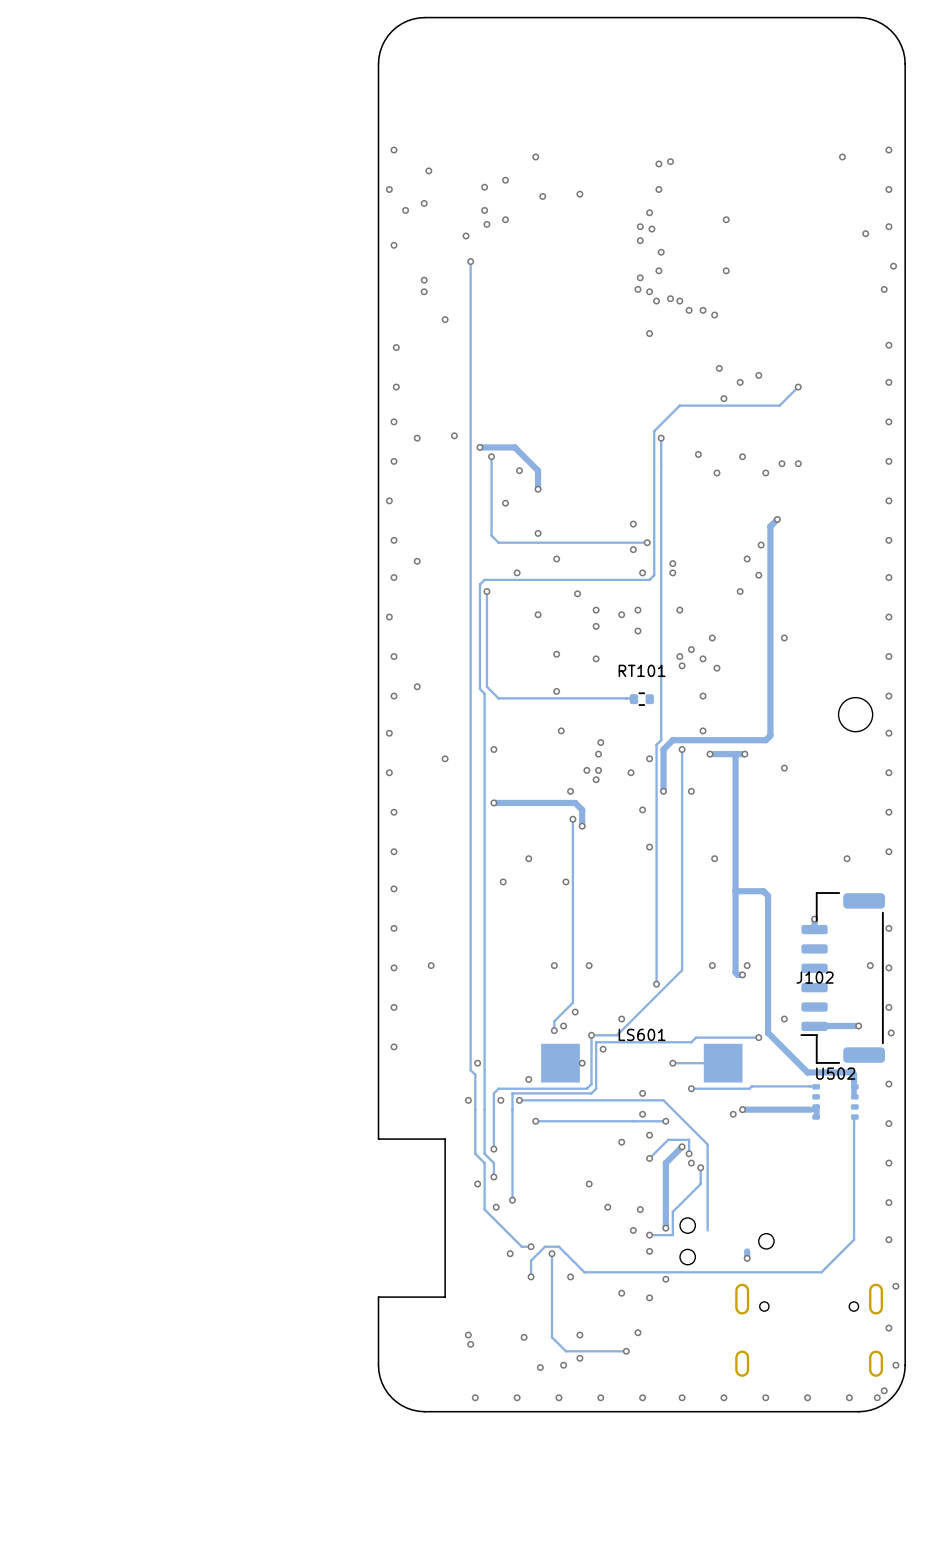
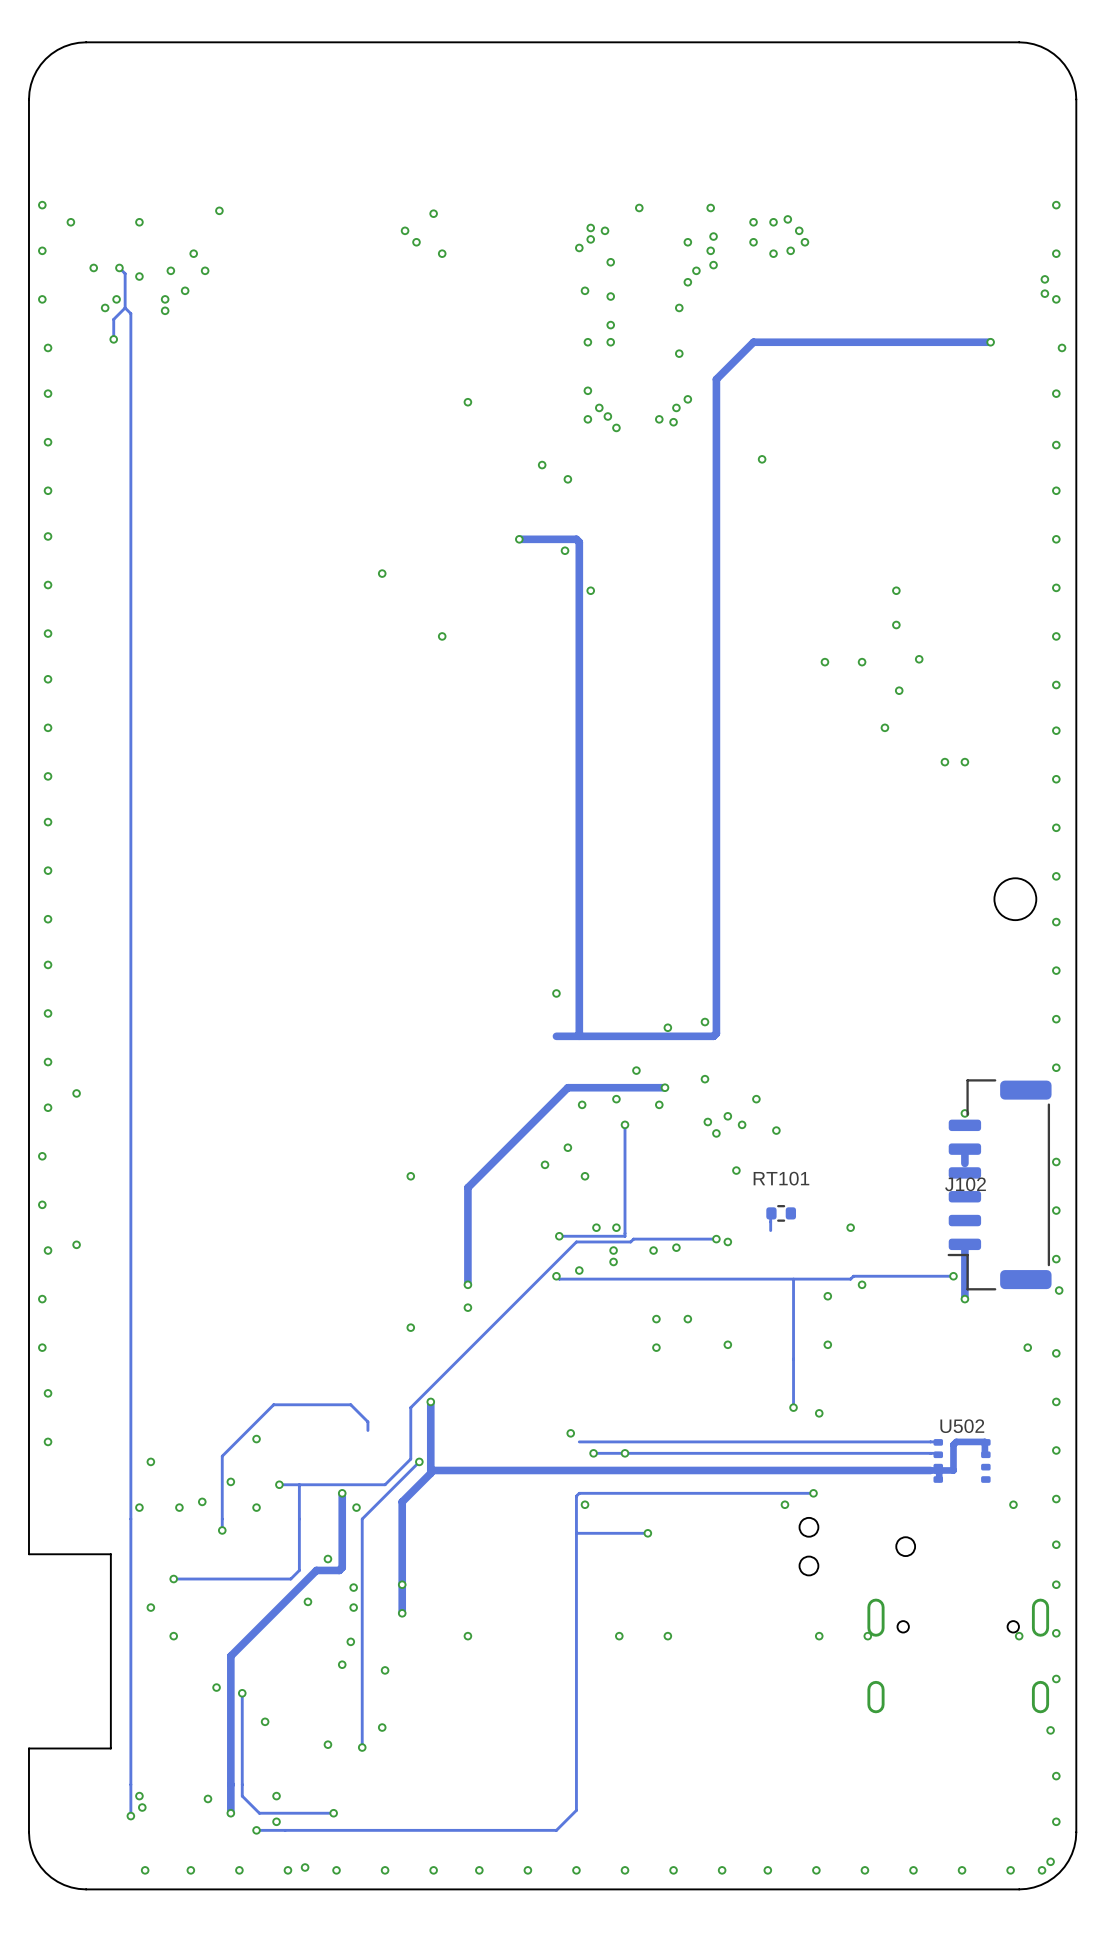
board edge: (424, 17) (407, 21) (392, 31) (382, 46) (378, 64) (378, 1139) (445, 1139) (445, 1297) (378, 1297) (378, 1365) (382, 1383) (392, 1398) (401, 1405) (412, 1410) (424, 1411) (858, 1411) (876, 1408) (891, 1398) (901, 1383) (905, 1365) -> (486, 42) (78, 42) (57, 49) (45, 59) (36, 70) (30, 84) (28, 99) (28, 1554) (110, 1554) (110, 1748) (28, 1748) (28, 1832) (33, 1854) (45, 1872) (57, 1881) (71, 1887) (86, 1889) (1026, 1888) (1041, 1885) (1059, 1872) (1068, 1860) (1074, 1847) (1076, 1832) (1076, 1698)
via: none -> (42, 205)
via position: (393, 150) -> (433, 213)
via: none -> (639, 207)
via: none -> (710, 207)
via: none -> (219, 210)
via: (535, 156) -> none
via: (842, 156) -> none
via: none -> (70, 222)
via: none -> (139, 222)
via: none -> (753, 222)
via: none -> (590, 227)
via: none -> (405, 230)
via: (428, 170) -> none
via: none -> (605, 230)
via: none -> (799, 230)
via: none -> (713, 236)
via: none -> (590, 239)
via: none -> (416, 242)
via: (505, 180) -> none
via: none -> (687, 242)
via: none -> (753, 242)
via: none -> (804, 242)
via: none -> (579, 247)
via: none -> (42, 250)
via: (484, 187) -> none
via: none -> (710, 250)
via: none -> (790, 250)
via: none -> (193, 253)
via: (579, 194) -> none
via: none -> (610, 262)
via: (542, 196) -> none
via: none -> (713, 265)
via: none -> (93, 267)
track: none -> (119, 267) (125, 273) (125, 307)
via: none -> (119, 267)
via: none -> (170, 270)
via: none -> (205, 270)
via: (424, 203) -> none
via: none -> (696, 270)
via: none -> (139, 276)
via: (405, 210) -> none
via: (484, 210) -> none
via: none -> (1044, 279)
via: none -> (687, 282)
via: (649, 212) -> none
via: none -> (185, 290)
via: (726, 219) -> none
via: none -> (1044, 293)
via: (486, 224) -> none
via: none -> (610, 296)
via: none -> (42, 299)
via: none -> (116, 299)
via: none -> (165, 299)
via: (640, 226) -> none
via: (651, 229) -> none
via: none -> (105, 307)
track: none -> (125, 307) (130, 313) (130, 1816)
track: none -> (125, 307) (113, 319) (113, 339)
via: none -> (679, 307)
via: (865, 233) -> none
via: none -> (165, 310)
via: (466, 235) -> none
via: (640, 240) -> none
via: (393, 245) -> none
via: none -> (610, 325)
via: (661, 252) -> none
via: none -> (113, 339)
track: (470, 261) (470, 1070) (475, 1074) (475, 1153) (484, 1163) (484, 1209) (521, 1246) (531, 1246) -> none
via: (470, 261) -> none
via: none -> (587, 342)
via: none -> (610, 342)
track: none -> (990, 342) (753, 342) (716, 379) (716, 1033) (713, 1036) (556, 1036)
via: none -> (990, 342)
via: none -> (48, 347)
via: none -> (679, 353)
via: (658, 270) -> none
via: (726, 270) -> none
via: (640, 277) -> none
via: (424, 280) -> none
via: (637, 289) -> none
via position: (884, 289) -> (1056, 393)
via: (424, 291) -> none
via: (649, 291) -> none
via: (670, 298) -> none
via: none -> (587, 390)
via: (656, 301) -> none
via: (679, 301) -> none
via: none -> (48, 393)
via: none -> (687, 399)
via: none -> (467, 402)
via: (689, 310) -> none
via: (703, 310) -> none
via: none -> (599, 407)
via: none -> (676, 407)
via: (714, 314) -> none
via: (445, 319) -> none
via: none -> (607, 416)
via: none -> (587, 419)
via: none -> (659, 419)
via: none -> (673, 422)
via: none -> (616, 427)
via position: (649, 333) -> (762, 459)
via: none -> (48, 442)
via: (396, 347) -> none
via: none -> (542, 465)
via: (719, 368) -> none
via: none -> (567, 479)
via: (758, 375) -> none
via: none -> (48, 490)
via: (740, 382) -> none
via: (396, 387) -> none
track: (798, 387) (779, 405) (679, 405) (654, 431) (654, 575) (649, 579) (484, 579) (479, 584) (479, 689) (484, 693) (484, 1153) (493, 1163) (493, 1177) -> none
via: (798, 387) -> none
via: (723, 398) -> none
via: none -> (48, 536)
via: (393, 421) -> none
track: none -> (519, 539) (576, 539) (579, 542) (579, 1036)
via: none -> (565, 550)
via position: (454, 435) -> (519, 539)
via: (417, 438) -> none
track: (661, 438) (661, 740) (656, 744) (656, 970) -> none
via: (661, 438) -> none
track: (479, 447) (514, 447) (538, 470) (538, 489) -> none
via: (479, 447) -> none
via: none -> (382, 573)
via: (698, 454) -> none
track: (491, 456) (491, 535) (498, 542) (647, 542) -> none
via: (491, 456) -> none
via: (742, 456) -> none
via: none -> (48, 585)
via: (393, 461) -> none
via: none -> (590, 590)
via: none -> (896, 590)
via: (782, 463) -> none
via: (798, 463) -> none
via: (519, 470) -> none
via: (716, 473) -> none
via: (765, 473) -> none
via: (538, 489) -> none
via: none -> (896, 625)
via: none -> (48, 633)
via: (505, 503) -> none
track: (777, 519) (770, 526) (770, 735) (765, 740) (672, 740) (663, 749) (663, 791) -> none
via: none -> (824, 662)
via: none -> (862, 662)
via: (633, 524) -> none
via: (538, 533) -> none
via: none -> (48, 679)
via: (393, 540) -> none
via: (647, 542) -> none
via: (633, 549) -> none
via: (556, 558) -> none
via: (747, 558) -> none
via: (417, 561) -> none
via: (672, 563) -> none
via: (517, 572) -> none
via: (642, 572) -> none
via: (672, 572) -> none
via: none -> (48, 727)
via: none -> (884, 727)
via: (758, 575) -> none
via: (393, 577) -> none
track: (486, 591) (486, 686) (498, 698) (633, 698) -> none
via: (486, 591) -> none
via: (740, 591) -> none
via: (577, 593) -> none
via: none -> (944, 762)
via: none -> (964, 762)
via: (596, 610) -> none
via: (637, 610) -> none
via: (679, 610) -> none
via: none -> (48, 776)
via: (538, 614) -> none
via: (621, 614) -> none
via: (389, 617) -> none
via: (596, 626) -> none
via: (637, 631) -> none
via: (712, 637) -> none
via: (784, 637) -> none
via: (691, 649) -> none
via: none -> (48, 822)
via: (556, 654) -> none
via: (393, 656) -> none
via: (679, 656) -> none
via: (596, 658) -> none
via: (703, 658) -> none
via: (682, 665) -> none
via: (716, 668) -> none
via: (417, 686) -> none
via: none -> (48, 870)
via: (556, 691) -> none
via: (393, 696) -> none
via: (703, 696) -> none
RT101 position: (641, 699) -> (781, 1213)
via: none -> (48, 919)
via: (561, 730) -> none
via: (703, 730) -> none
via: (389, 733) -> none
via: (600, 742) -> none
via: (493, 749) -> none
track: (682, 749) (682, 970) (617, 1035) (591, 1035) (591, 1084) (586, 1088) (498, 1088) (493, 1093) (493, 1149) -> none
via: (682, 749) -> none
via: (598, 754) -> none
via: (709, 754) -> none
track: (735, 754) (735, 972) (742, 974) -> none
track: (744, 754) (709, 754) -> none
via: (744, 754) -> none
via: (445, 758) -> none
via: (649, 758) -> none
via: none -> (48, 964)
via: (784, 768) -> none
via: (586, 770) -> none
via: (598, 770) -> none
via: (389, 772) -> none
via: (630, 772) -> none
via: (596, 779) -> none
via: (570, 791) -> none
via: (663, 791) -> none
via: (691, 791) -> none
track: (493, 802) (575, 802) (582, 809) (582, 826) -> none
via position: (493, 802) -> (556, 993)
via: none -> (48, 1013)
via: (642, 809) -> none
via: (393, 812) -> none
via: none -> (704, 1022)
track: (572, 819) (572, 1002) (554, 1021) (554, 1030) -> none
via: (582, 826) -> none
via: none -> (48, 1062)
via: (649, 847) -> none
via: (393, 851) -> none
via: none -> (636, 1070)
via: (528, 858) -> none
via: (714, 858) -> none
via: (847, 858) -> none
via: none -> (704, 1079)
track: none -> (664, 1087) (567, 1087) (467, 1187) (467, 1284)
via: none -> (664, 1087)
via: none -> (76, 1093)
via: none -> (616, 1099)
via: none -> (756, 1099)
via: none -> (48, 1107)
via: (393, 888) -> none
via: none -> (964, 1113)
via: none -> (727, 1116)
track: (735, 891) (763, 891) (768, 895) (768, 1032) (807, 1072) (851, 1072) (854, 1074) (854, 1095) -> none
via: none -> (707, 1122)
track: none -> (625, 1124) (625, 1236) (559, 1236)
via: none -> (625, 1124)
via: none -> (742, 1124)
via: none -> (776, 1130)
via: none -> (716, 1133)
via: none -> (567, 1147)
via: (814, 919) -> none
via: none -> (42, 1156)
via: (393, 928) -> none
via: none -> (545, 1164)
via: none -> (736, 1170)
via: none -> (410, 1176)
via: none -> (585, 1176)
via: none -> (42, 1204)
via: (431, 965) -> none
via: (554, 965) -> none
via: (589, 965) -> none
via: (712, 965) -> none
via: (747, 965) -> none
via: (870, 965) -> none
via: (393, 967) -> none
via: (742, 974) -> none
J102 position: (842, 977) -> (999, 1184)
via: none -> (596, 1227)
via: none -> (616, 1227)
via: none -> (850, 1227)
via: (656, 984) -> none
via: none -> (559, 1236)
track: none -> (716, 1239) (633, 1239) (630, 1241) (576, 1241) (410, 1407) (410, 1459) (385, 1484) (279, 1484)
via: none -> (716, 1239)
via: none -> (727, 1241)
via: none -> (76, 1244)
track: none -> (964, 1244) (964, 1299)
via: none -> (676, 1247)
via: none -> (48, 1250)
via: none -> (613, 1250)
via: none -> (653, 1250)
via: (393, 1007) -> none
via: none -> (613, 1261)
via: (575, 1012) -> none
via: none -> (579, 1270)
via: (621, 1019) -> none
via: (784, 1019) -> none
via: none -> (556, 1276)
track: none -> (953, 1276) (853, 1276) (850, 1279) (559, 1279) (556, 1276)
via: none -> (953, 1276)
track: none -> (793, 1279) (793, 1407)
via: (563, 1026) -> none
track: (858, 1026) (814, 1026) -> none
via: (858, 1026) -> none
via: none -> (467, 1284)
via: none -> (862, 1284)
via: (554, 1030) -> none
via: (591, 1035) -> none
via: none -> (827, 1296)
track: (758, 1037) (696, 1037) (691, 1042) (596, 1042) (596, 1088) (591, 1093) (512, 1093) (512, 1200) -> none
via: (758, 1037) -> none
via: none -> (42, 1299)
via: none -> (964, 1299)
via: (393, 1046) -> none
via: none -> (467, 1307)
via: (603, 1049) -> none
via: none -> (656, 1319)
via: none -> (687, 1319)
via: none -> (410, 1327)
via: (477, 1063) -> none
via: (582, 1063) -> none
LS601: (641, 1063) -> none
via: (672, 1063) -> none
track: (723, 1063) (672, 1063) -> none
via: none -> (727, 1344)
via: none -> (42, 1347)
via: (528, 1079) -> none
via: none -> (656, 1347)
via: none -> (1027, 1347)
track: (816, 1086) (691, 1088) -> none
via position: (691, 1088) -> (827, 1344)
via: (642, 1093) -> none
via: (468, 1100) -> none
via: (500, 1100) -> none
track: (519, 1100) (663, 1100) (707, 1144) (707, 1230) -> none
via: (519, 1100) -> none
U502 position: (835, 1101) -> (962, 1460)
track: (742, 1109) (814, 1109) (816, 1107) (816, 1116) -> none
via: (742, 1109) -> none
via: (642, 1114) -> none
via: (733, 1114) -> none
via: none -> (48, 1393)
track: (854, 1116) (854, 1239) (821, 1272) (584, 1272) (558, 1246) (545, 1246) (531, 1260) (531, 1276) -> none
via: (535, 1121) -> none
track: (665, 1121) (535, 1121) -> none
via: (665, 1121) -> none
track: none -> (430, 1401) (430, 1473) (402, 1501) (402, 1613)
via: none -> (430, 1401)
via: none -> (793, 1407)
via: none -> (819, 1413)
via: (649, 1135) -> none
via: (621, 1142) -> none
track: none -> (367, 1430) (367, 1421) (350, 1404) (273, 1404) (222, 1456) (222, 1530)
track: (682, 1146) (665, 1163) (665, 1228) -> none
via: (682, 1146) -> none
via: none -> (256, 1439)
track: (689, 1153) (689, 1139) (668, 1139) (649, 1158) -> none
via: (689, 1153) -> none
via: none -> (48, 1441)
track: none -> (939, 1441) (579, 1441)
via: (649, 1158) -> none
via: (691, 1163) -> none
via: none -> (593, 1453)
via: none -> (625, 1453)
track: none -> (939, 1453) (593, 1453)
track: none -> (984, 1453) (984, 1441) (956, 1441) (953, 1444) (953, 1470) (939, 1470)
track: (700, 1167) (700, 1184) (672, 1211) (672, 1235) (649, 1235) -> none
via: (700, 1167) -> none
via: none -> (150, 1461)
track: none -> (419, 1461) (362, 1519) (362, 1747)
via: none -> (419, 1461)
via: (493, 1177) -> none
track: none -> (430, 1470) (936, 1470) (939, 1467) (939, 1479)
via: (477, 1184) -> none
via: (589, 1184) -> none
via: none -> (230, 1481)
via: none -> (279, 1484)
track: none -> (299, 1484) (299, 1570) (290, 1579) (173, 1579)
track: none -> (342, 1493) (342, 1567) (339, 1570) (316, 1570) (230, 1656) (230, 1813)
via: none -> (342, 1493)
track: none -> (813, 1493) (579, 1493) (576, 1496) (576, 1810) (556, 1830) (256, 1830)
via: none -> (813, 1493)
via: (512, 1200) -> none
via: none -> (202, 1501)
via: (496, 1207) -> none
via: none -> (585, 1504)
via: (607, 1207) -> none
via: none -> (784, 1504)
via: none -> (1013, 1504)
via: none -> (139, 1507)
via: none -> (179, 1507)
via: none -> (256, 1507)
via: none -> (356, 1507)
via: (640, 1209) -> none
via: none -> (222, 1530)
via: (665, 1228) -> none
track: none -> (647, 1533) (576, 1533)
via: none -> (647, 1533)
via: (633, 1230) -> none
via: (649, 1235) -> none
via: (531, 1246) -> none
via: none -> (327, 1559)
via: (649, 1251) -> none
track: (747, 1251) (747, 1258) -> none
via: (510, 1253) -> none
track: (551, 1253) (551, 1337) (565, 1351) (626, 1351) -> (242, 1693) (242, 1796) (259, 1813) (333, 1813)
via: (551, 1253) -> none
via: (747, 1258) -> none
via: none -> (173, 1579)
via: none -> (402, 1584)
via: none -> (1056, 1584)
via: none -> (353, 1587)
via: (531, 1276) -> none
via: (570, 1276) -> none
via: (665, 1279) -> none
via: none -> (307, 1601)
via: (895, 1286) -> none
via: none -> (150, 1607)
via: none -> (353, 1607)
via: (621, 1293) -> none
via: none -> (402, 1613)
via: (649, 1297) -> none
via: none -> (1056, 1633)
via: none -> (173, 1636)
via: none -> (467, 1636)
via: none -> (619, 1636)
via: none -> (667, 1636)
via: none -> (819, 1636)
via: none -> (867, 1636)
via: none -> (1019, 1636)
via: none -> (350, 1641)
via: (888, 1328) -> none
via: (637, 1332) -> none
via: (468, 1335) -> none
via: (579, 1335) -> none
via: none -> (342, 1664)
via: (524, 1337) -> none
via: none -> (385, 1670)
via: (470, 1344) -> none
via: none -> (1056, 1678)
via: (626, 1351) -> none
via: none -> (216, 1687)
via: (579, 1358) -> none
via: none -> (242, 1693)
via: (563, 1365) -> none
via: (895, 1365) -> none
via: (540, 1367) -> none
via: none -> (265, 1721)
via: none -> (382, 1727)
via: (475, 1397) -> none
via: (517, 1397) -> none
via: (558, 1397) -> none
via: (600, 1397) -> none
via: (642, 1397) -> none
via: (682, 1397) -> none
via: (723, 1397) -> none
via: (765, 1397) -> none
via: (807, 1397) -> none
via: (849, 1397) -> none
via: (877, 1397) -> none
via: none -> (327, 1744)
via: none -> (362, 1747)
via: none -> (1056, 1776)
via: none -> (139, 1796)
via: none -> (276, 1796)
via: none -> (207, 1798)
via: none -> (142, 1807)
via: none -> (230, 1813)
via: none -> (333, 1813)
via: none -> (130, 1816)
via: none -> (276, 1821)
via: none -> (1056, 1821)
via: none -> (256, 1830)
via: none -> (1050, 1861)
via: none -> (305, 1867)
via: none -> (145, 1870)
via: none -> (190, 1870)
via: none -> (239, 1870)
via: none -> (287, 1870)
via: none -> (336, 1870)
via: none -> (385, 1870)
via: none -> (433, 1870)
via: none -> (479, 1870)
via: none -> (527, 1870)
via: none -> (576, 1870)
via: none -> (625, 1870)
via: none -> (673, 1870)
via: none -> (722, 1870)
via: none -> (767, 1870)
via: none -> (816, 1870)
via: none -> (864, 1870)
via: none -> (913, 1870)
via: none -> (962, 1870)
via: none -> (1010, 1870)
via: none -> (1042, 1870)

